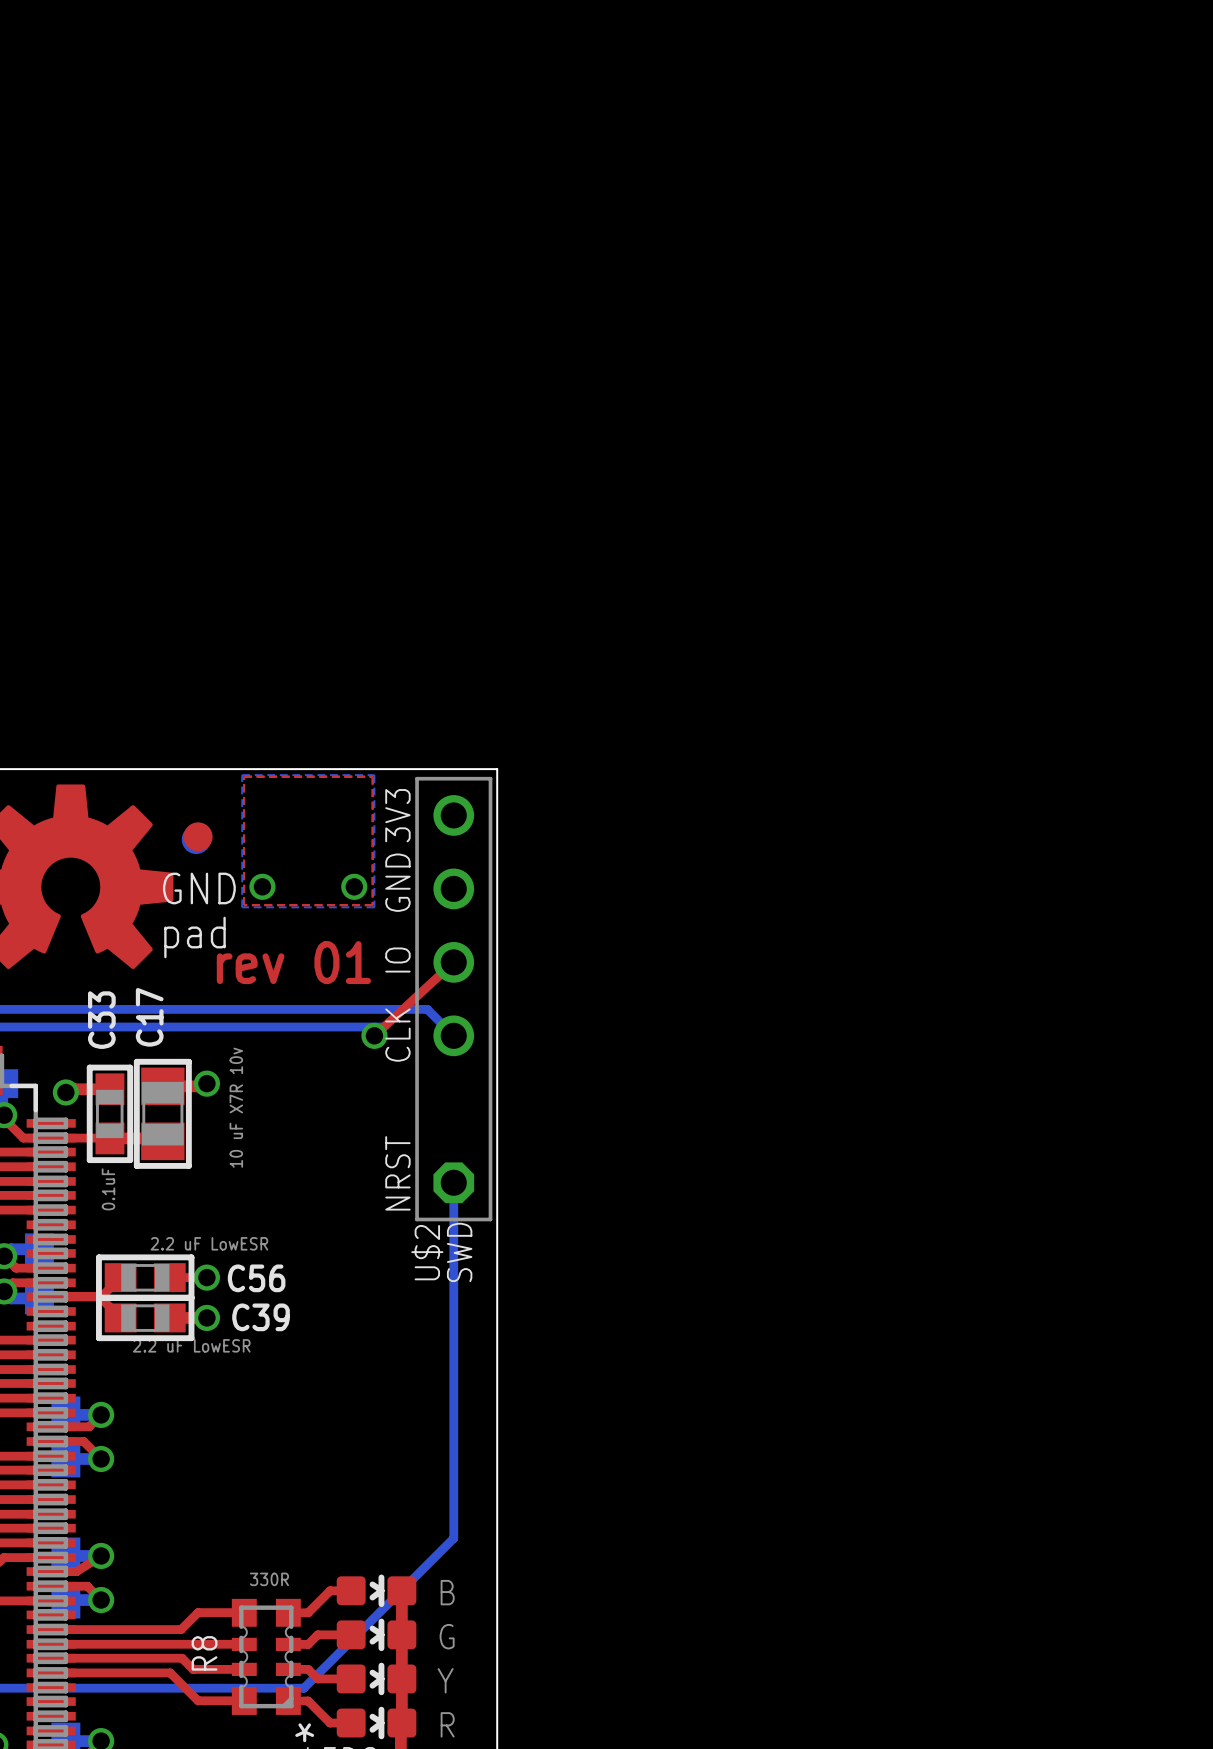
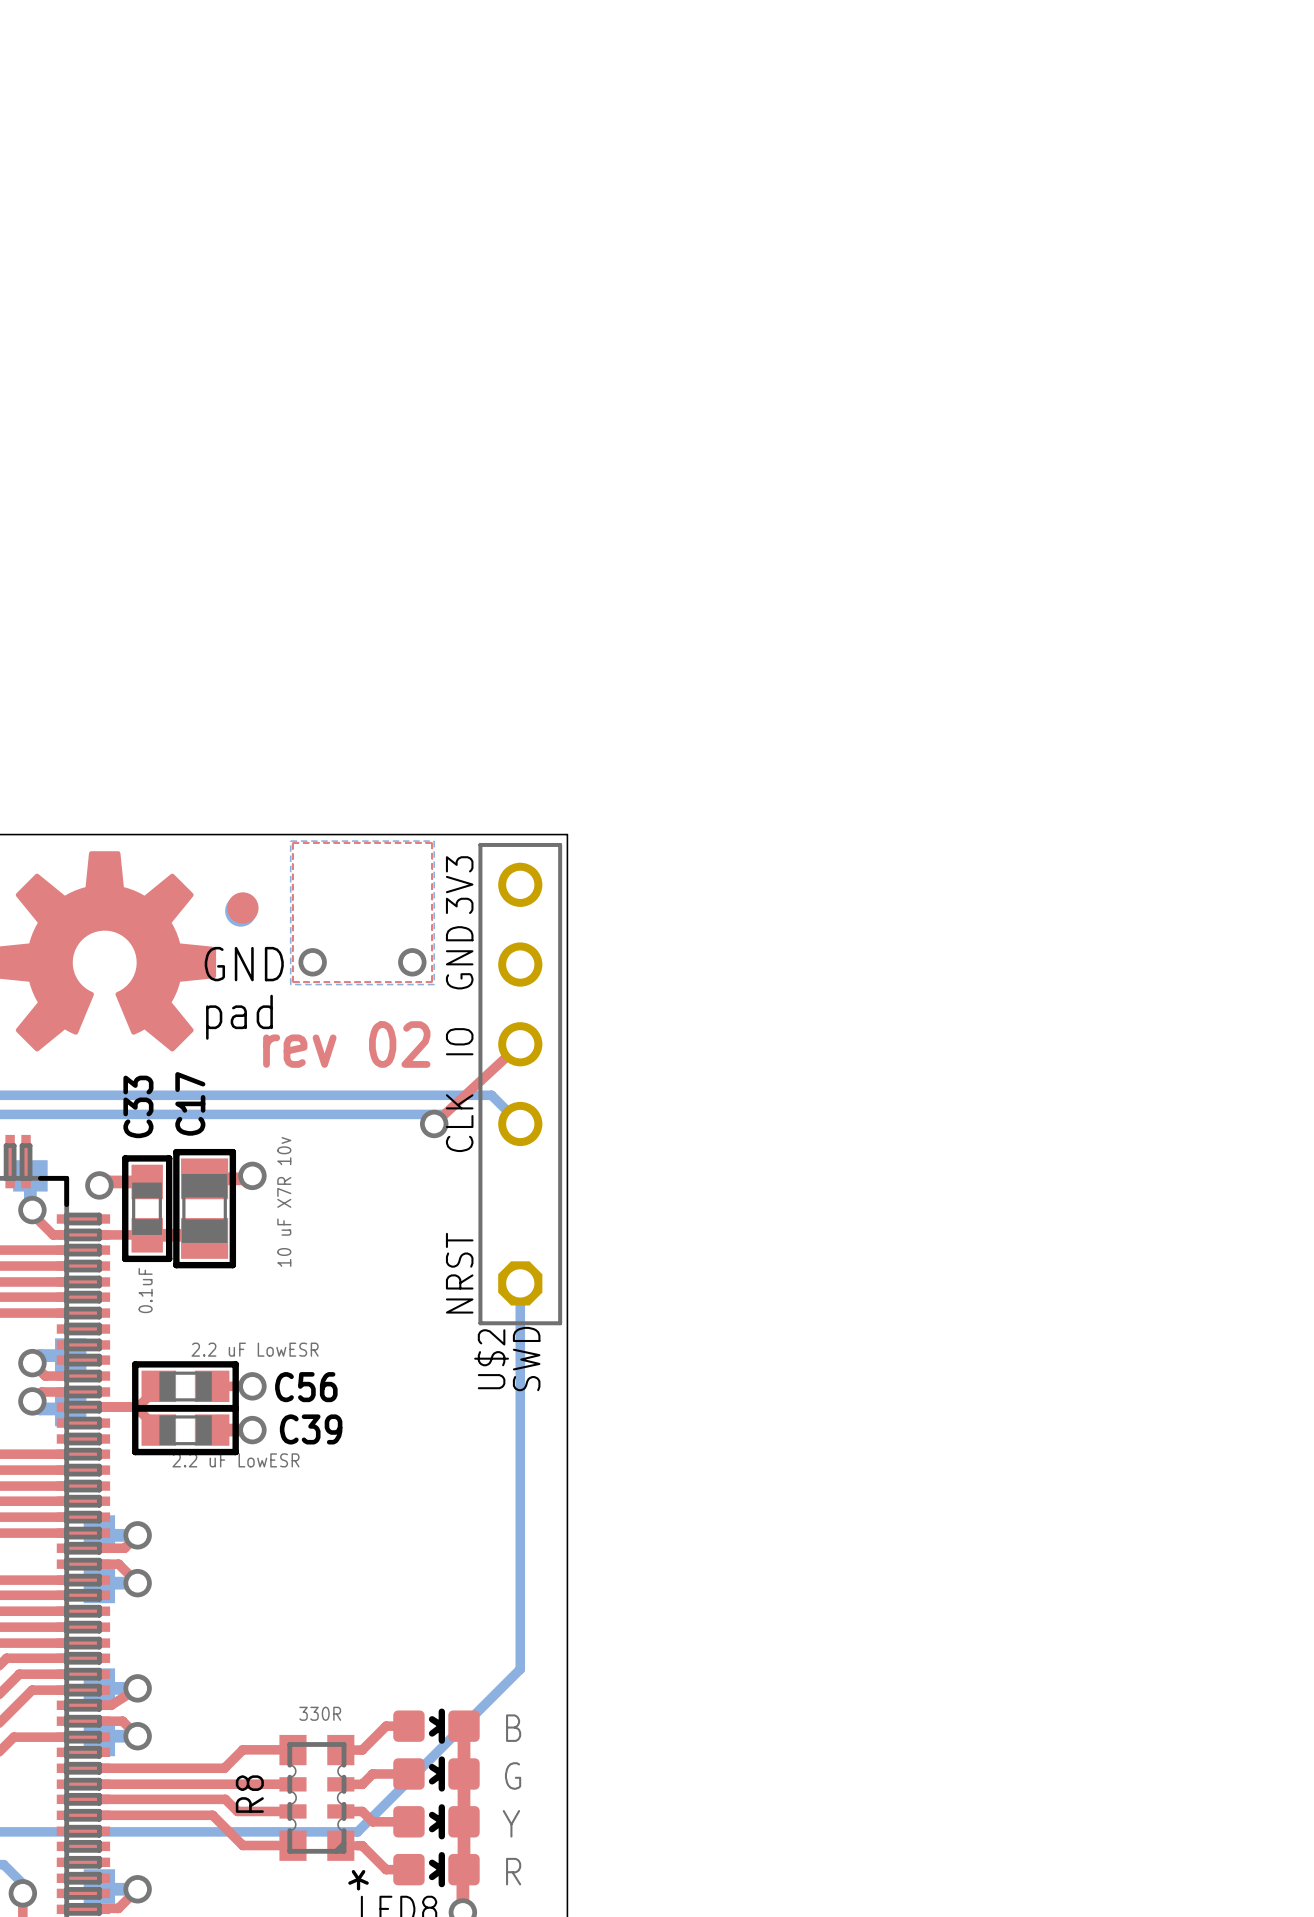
text: rev 01 (293, 962) -> rev 02 (346, 1044)

